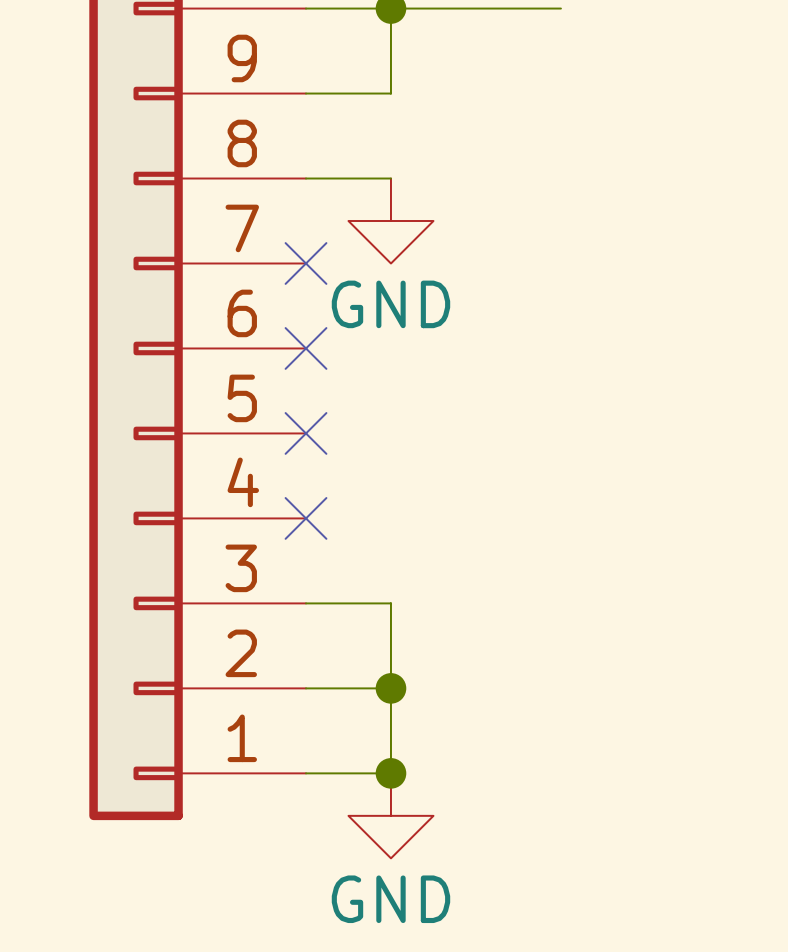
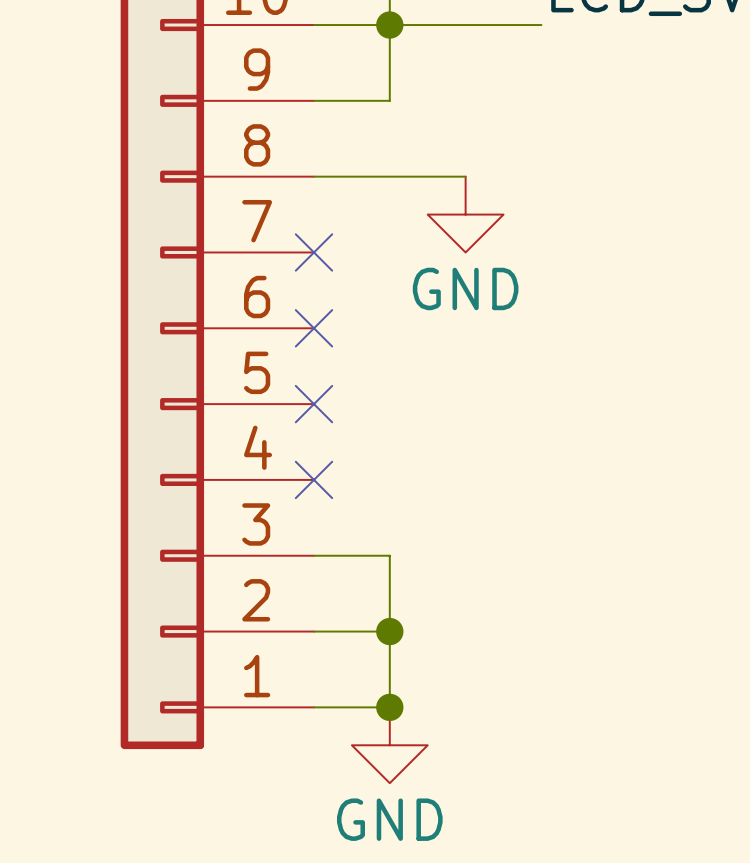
wire: none -> (389, 176) (465, 176)
power symbol position: GND (390, 221) -> GND (465, 214)

